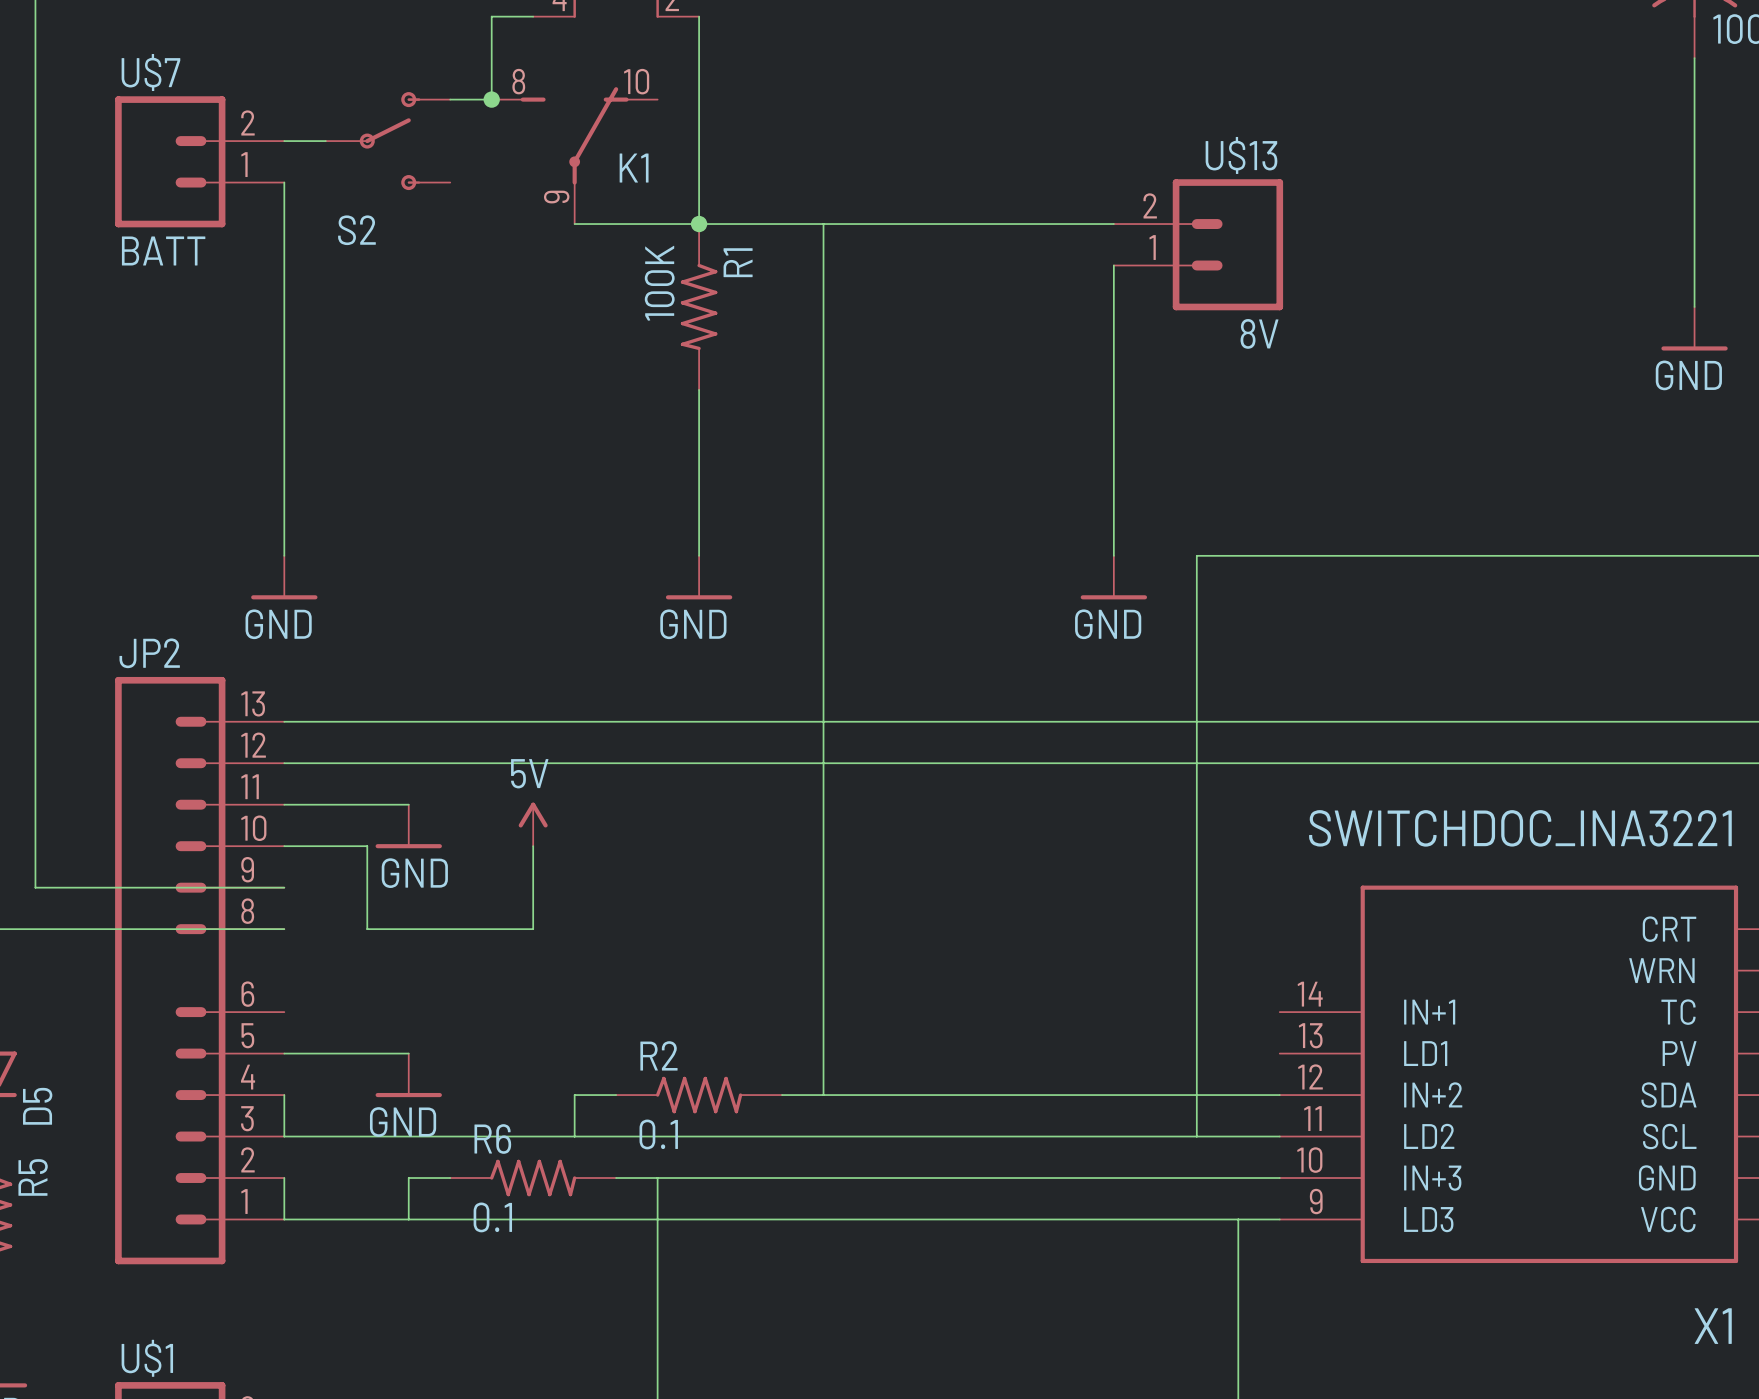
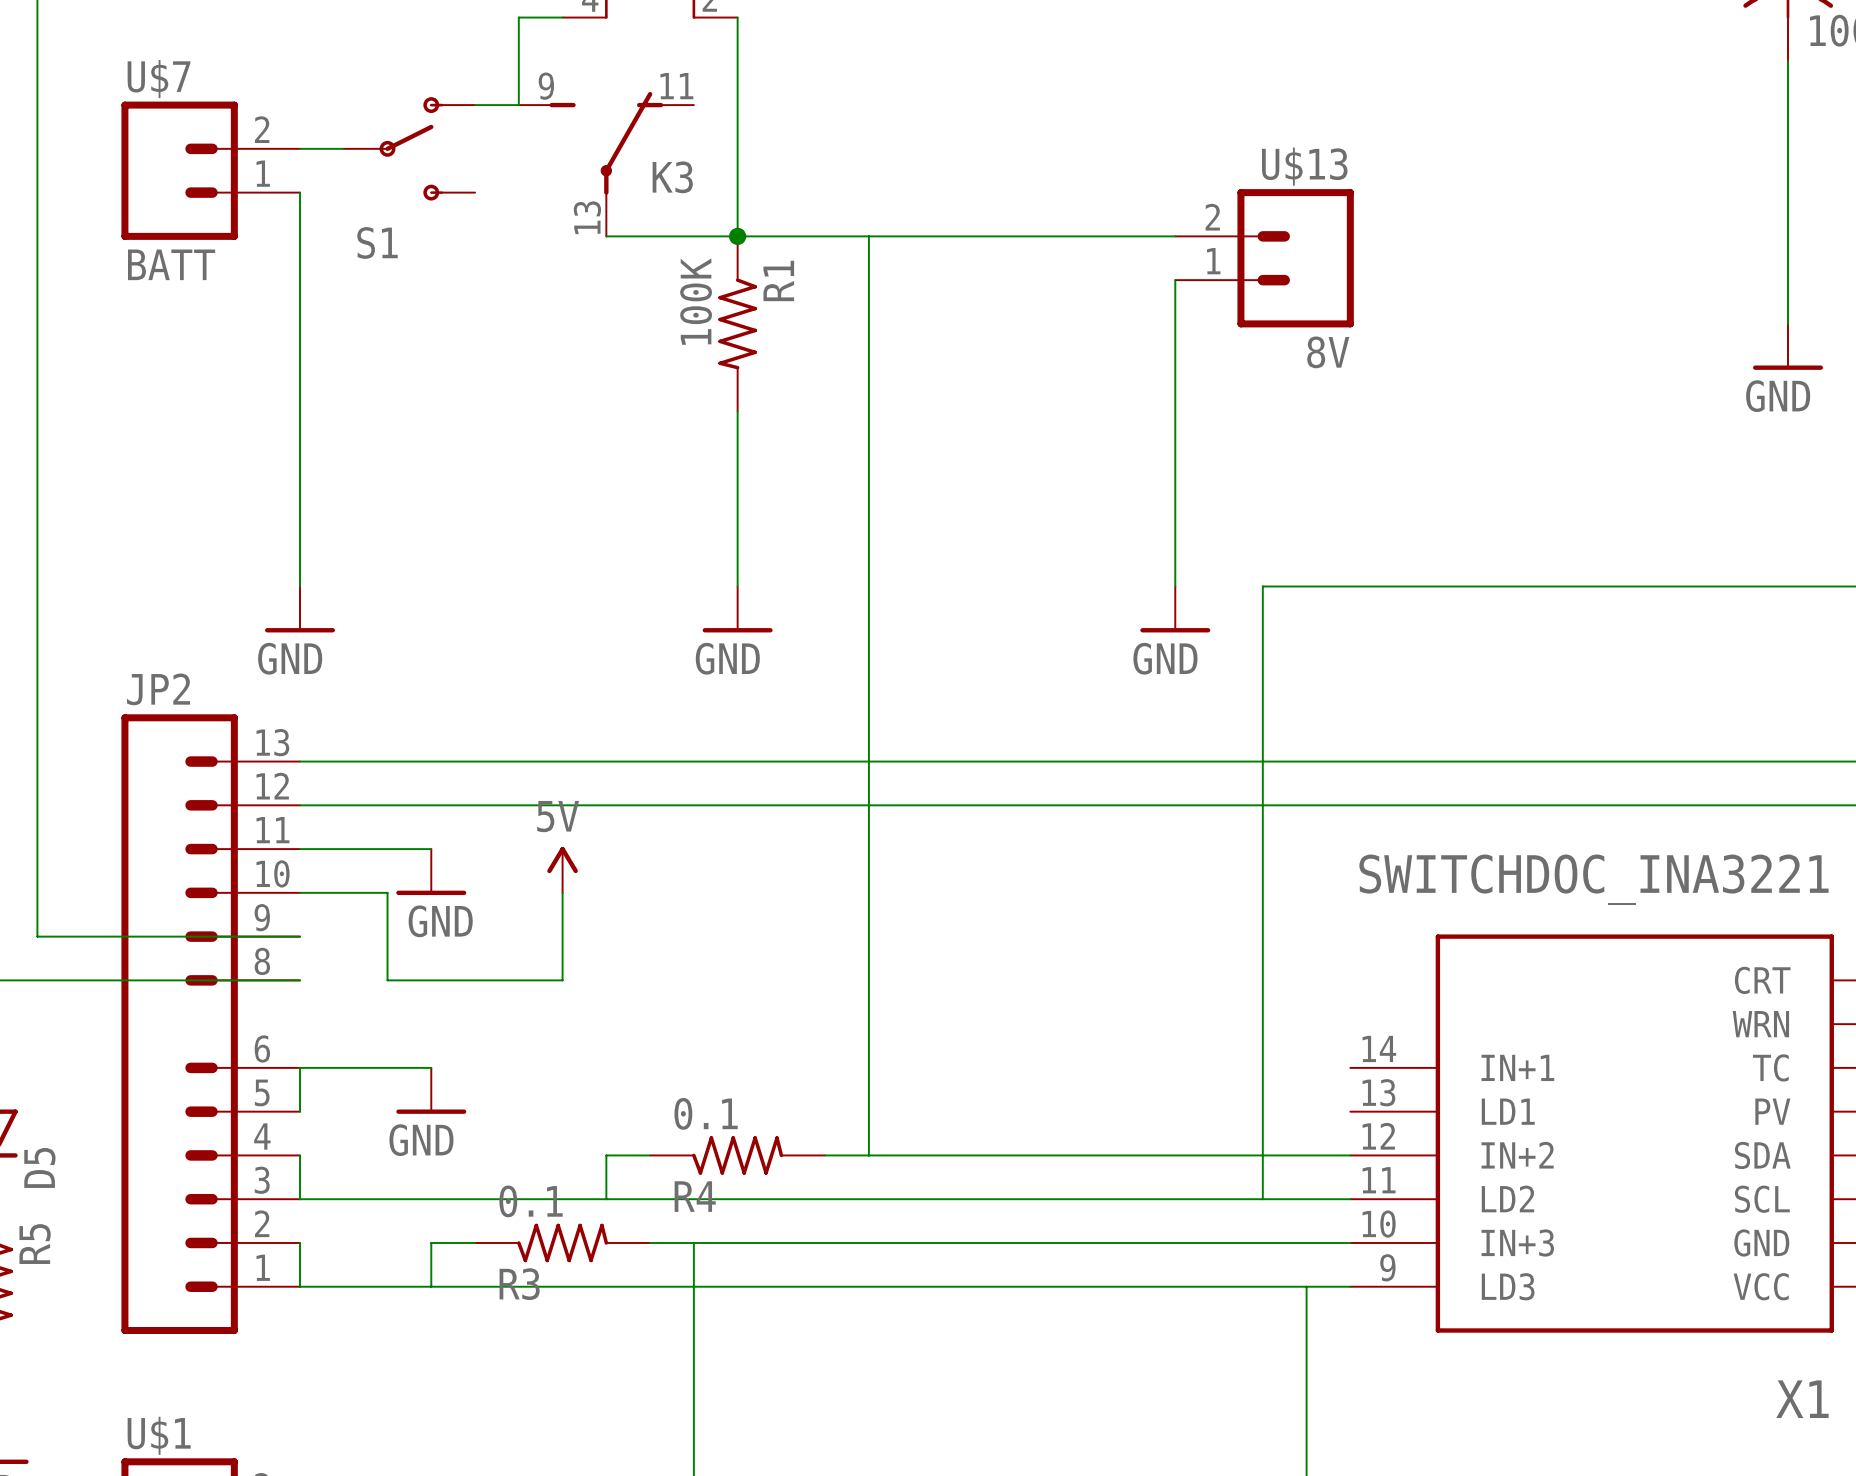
K1 pin number: 8 (518, 81) -> 9 (546, 86)
K1 pin number: 10 (636, 81) -> 11 (676, 86)
junction: (491, 99) -> none
K1 name: K1 (634, 168) -> K3 (672, 177)
K1 pin number: 9 (556, 197) -> 13 (587, 217)
S2 name: S2 (356, 230) -> S1 (377, 242)
wire: (284, 1053) (408, 1053) -> (299, 1111) (299, 1067) (431, 1067)
power symbol position: GND (408, 1075) -> GND (431, 1090)
R2: 0.1 (699, 1095) -> none
R4: none -> 0.1 (737, 1155)
R6: 0.1 (533, 1178) -> none
R3: none -> 0.1 (562, 1242)

